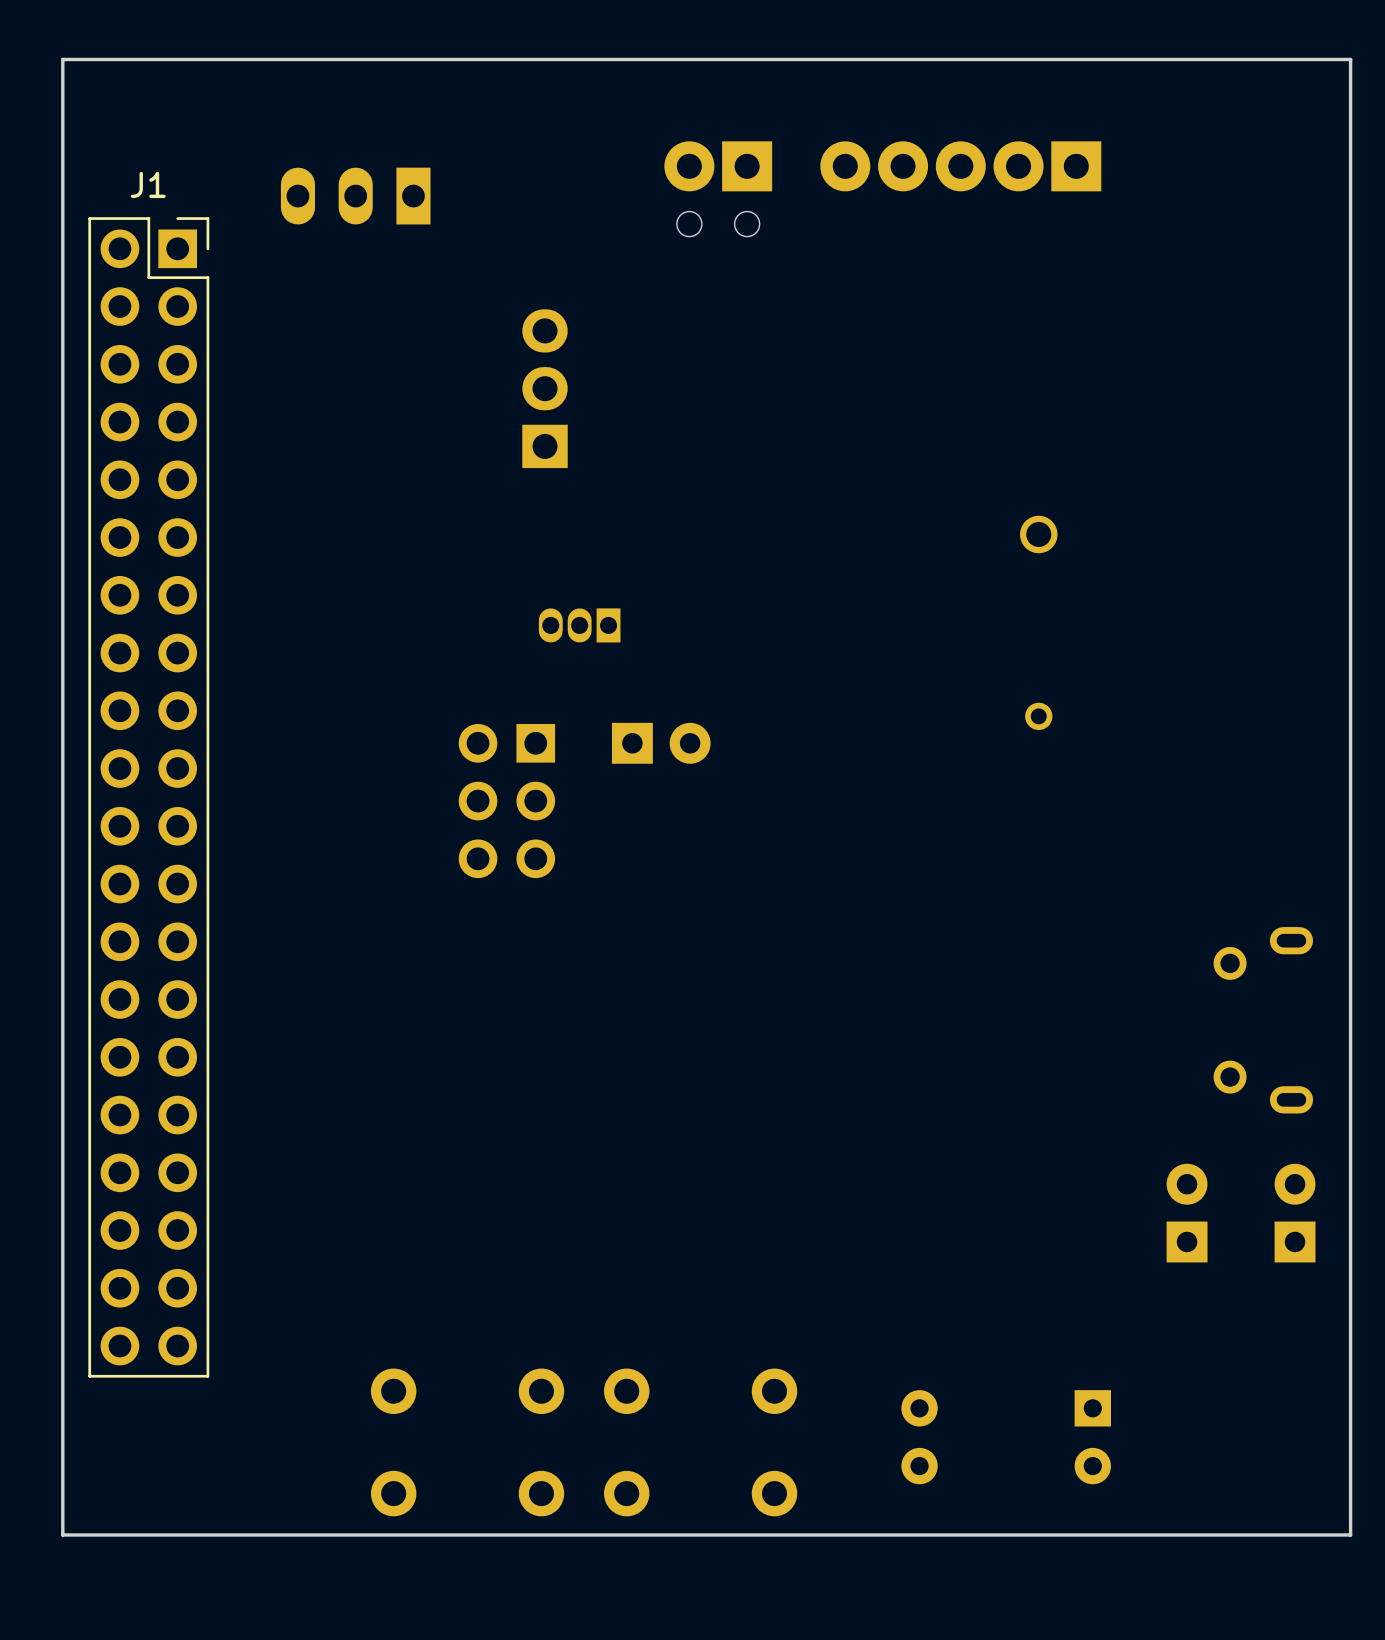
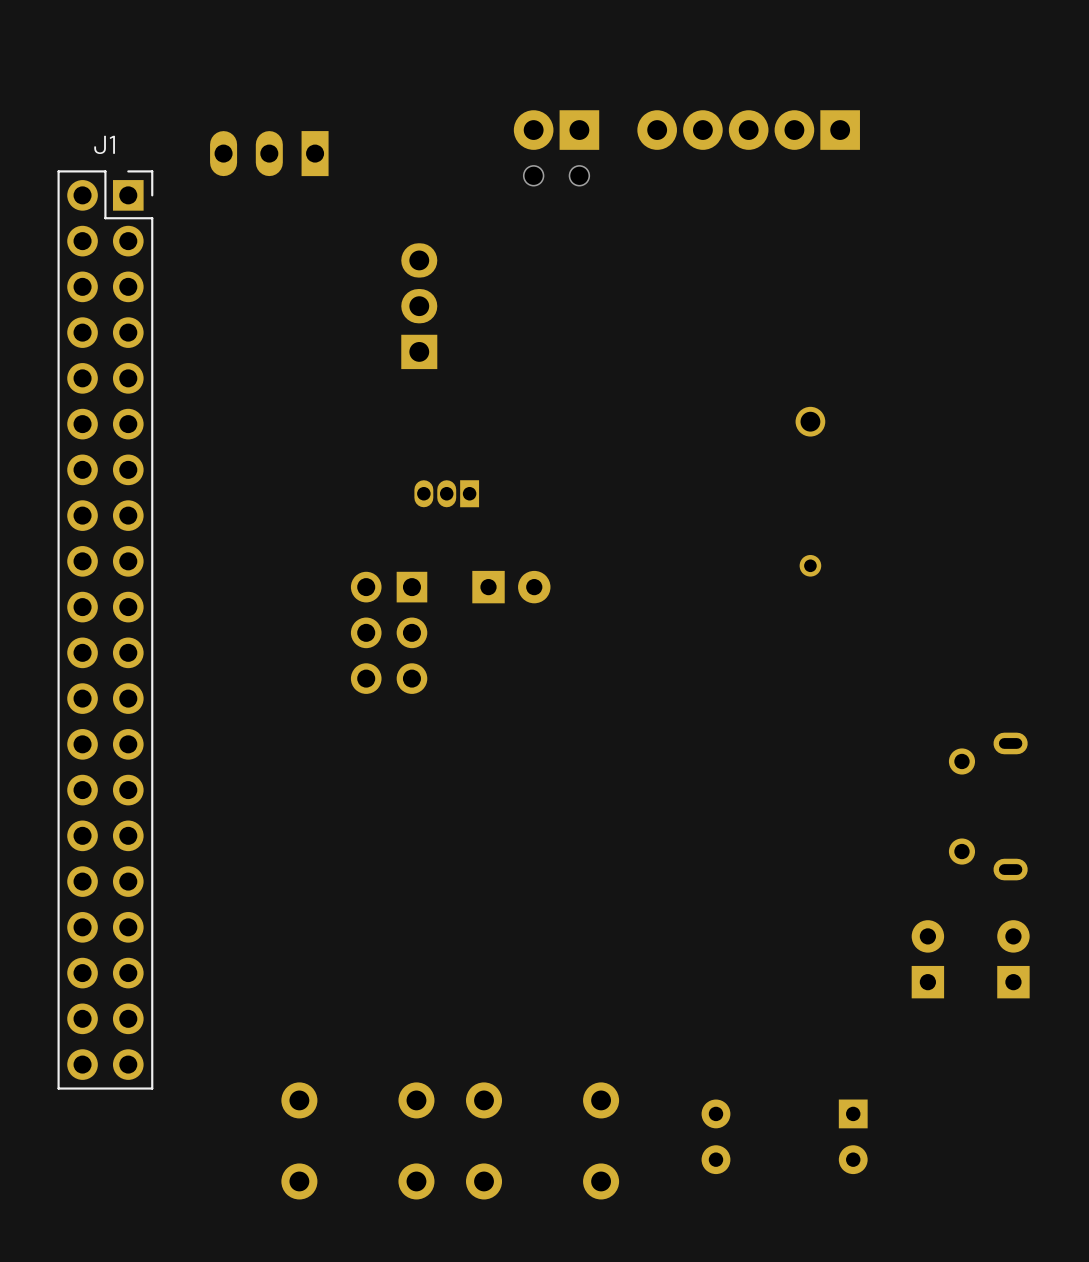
board edge: (1350, 59) (62, 59) (62, 1534) (1350, 1534) (1350, 59) -> none

